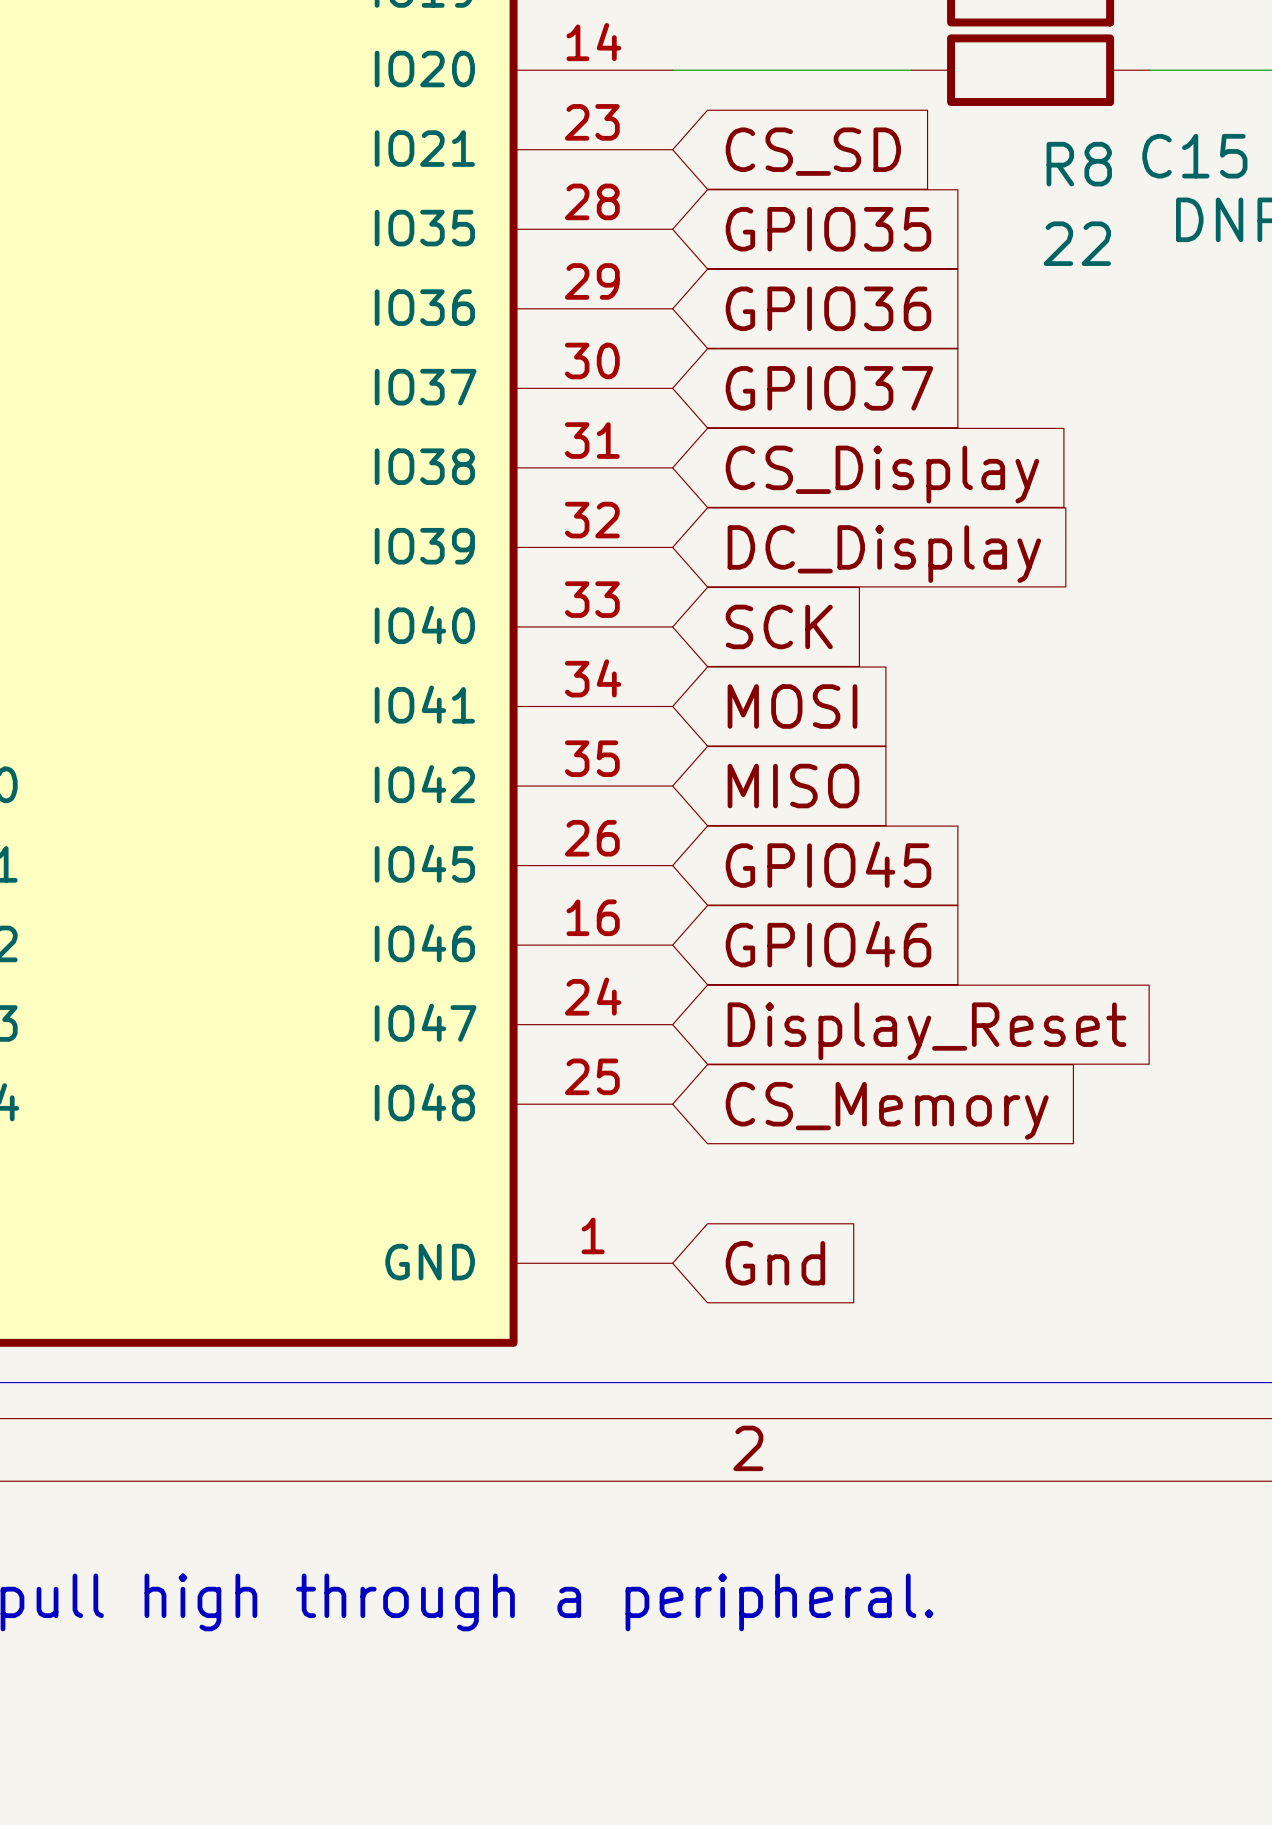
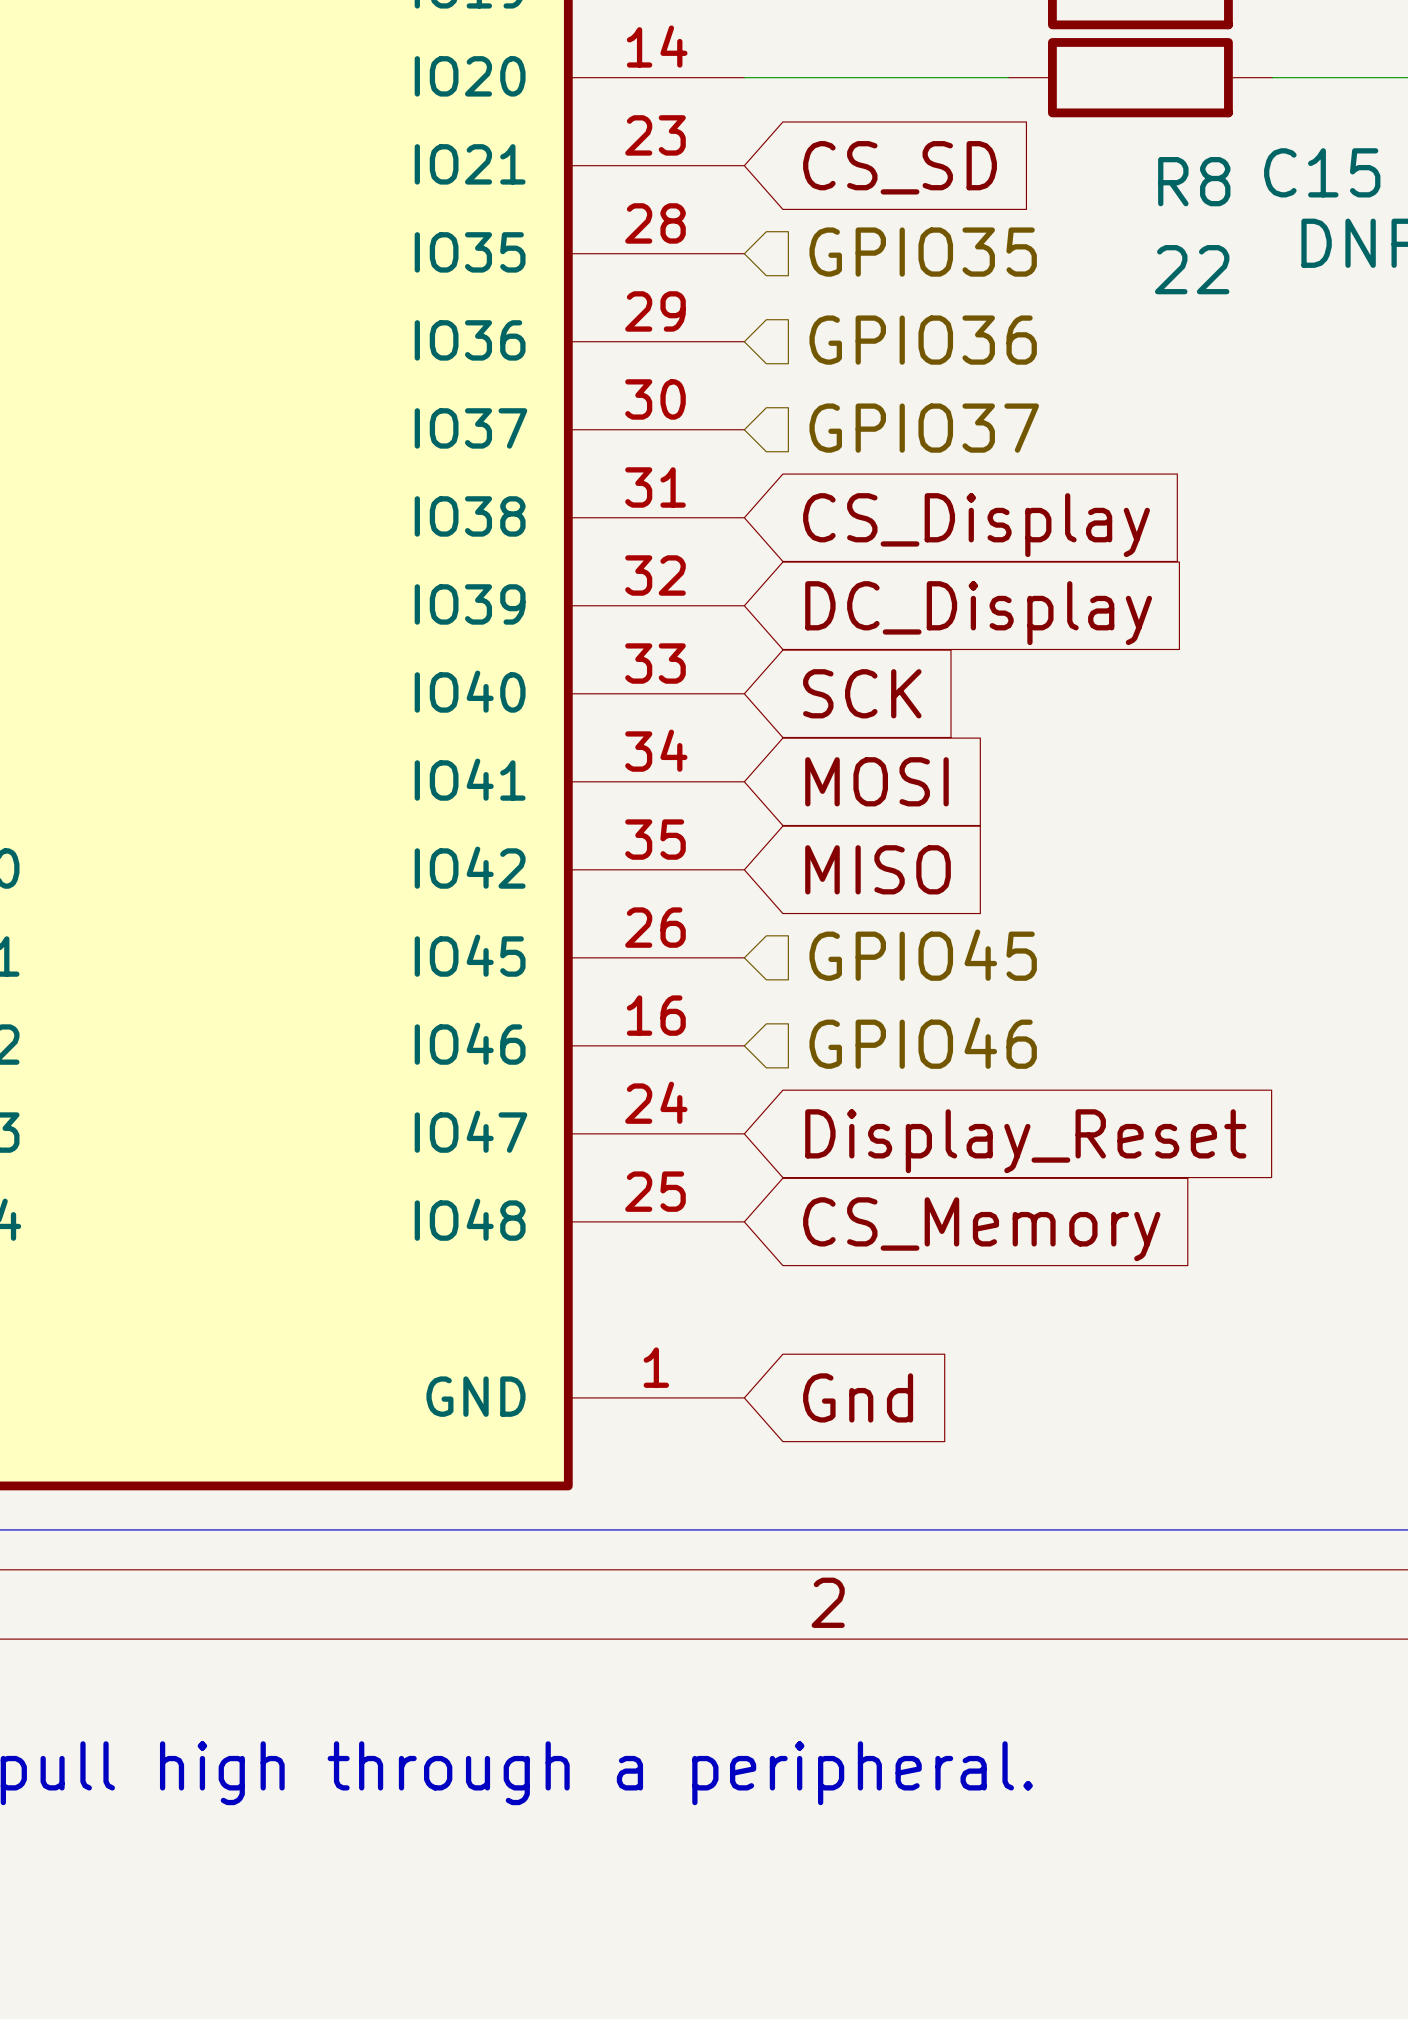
hierarchical label: none -> GPIO35 (923, 252)
global label: GPIO35 (828, 229) -> none
hierarchical label: none -> GPIO36 (923, 340)
global label: GPIO36 (828, 308) -> none
hierarchical label: none -> GPIO37 (924, 428)
global label: GPIO37 (829, 388) -> none
hierarchical label: none -> GPIO45 (923, 955)
global label: GPIO45 (828, 864) -> none
hierarchical label: none -> GPIO46 (923, 1043)
global label: GPIO46 (828, 944) -> none

